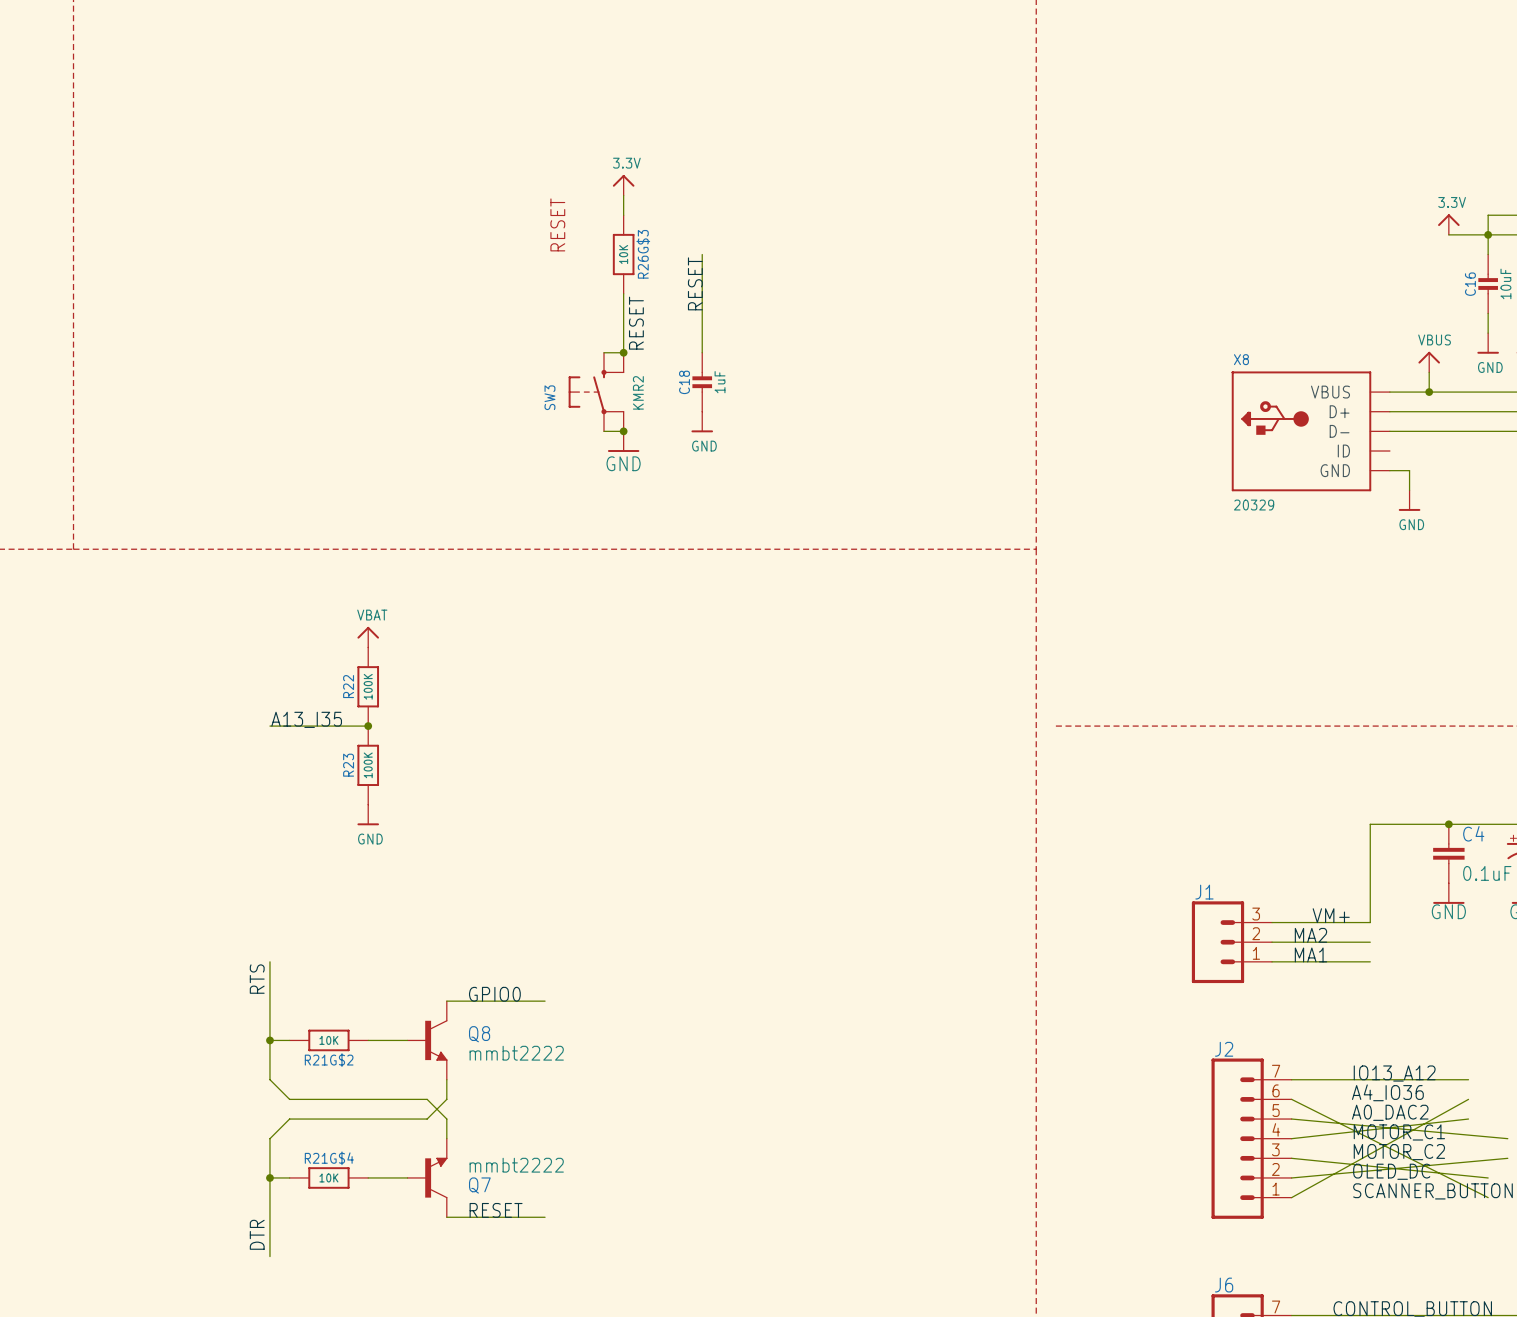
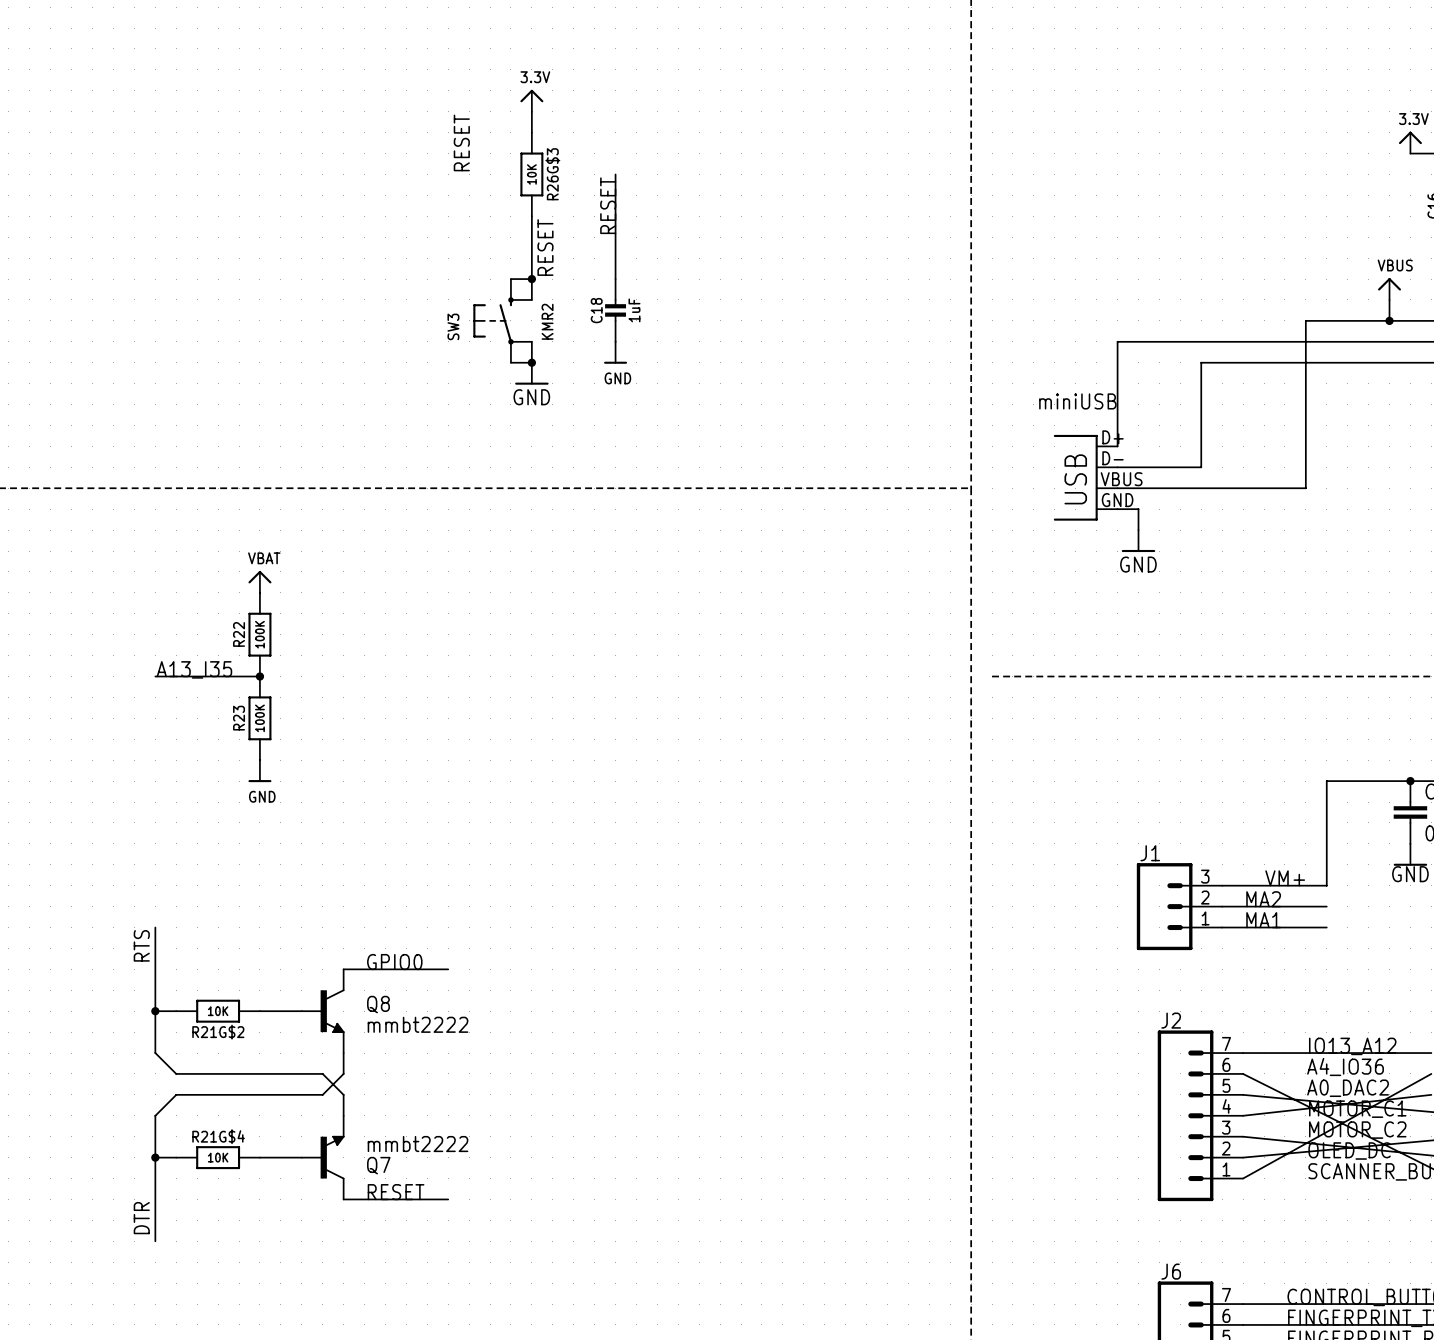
wire: none -> (1347, 320) (1305, 320) (1305, 488) (1117, 488)
wire: none -> (1347, 341) (1117, 341) (1117, 446)
X8: 20329 (1310, 431) -> none
wire: none -> (1347, 362) (1201, 362) (1201, 467) (1117, 467)
text: none -> miniUSB (1077, 401)
wire: (1389, 470) (1409, 470) (1409, 490) -> none
power symbol: GND (1409, 500) -> none
part: none -> (1085, 477)
wire: none -> (1117, 509) (1138, 509) (1138, 530)
power symbol: none -> GND (1138, 541)

